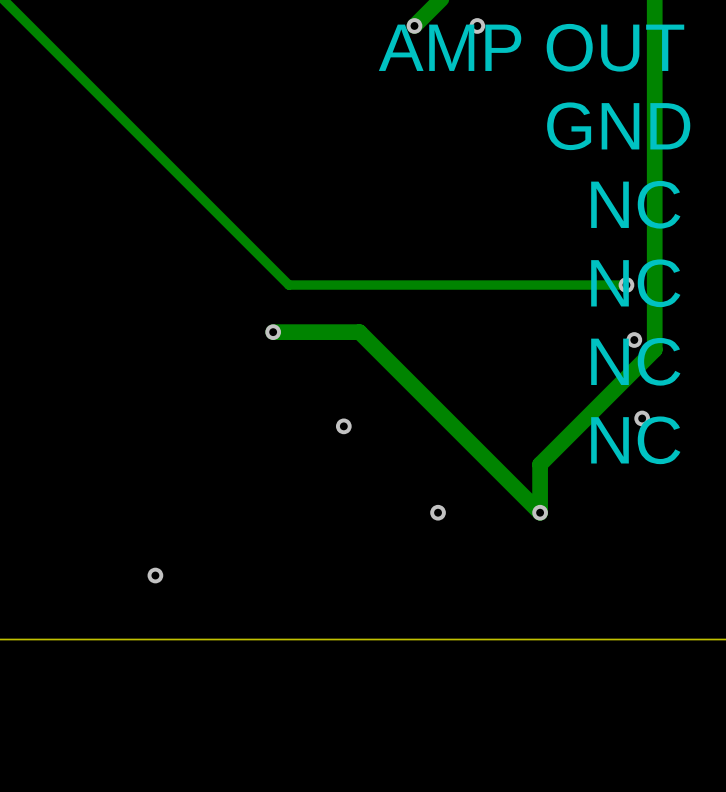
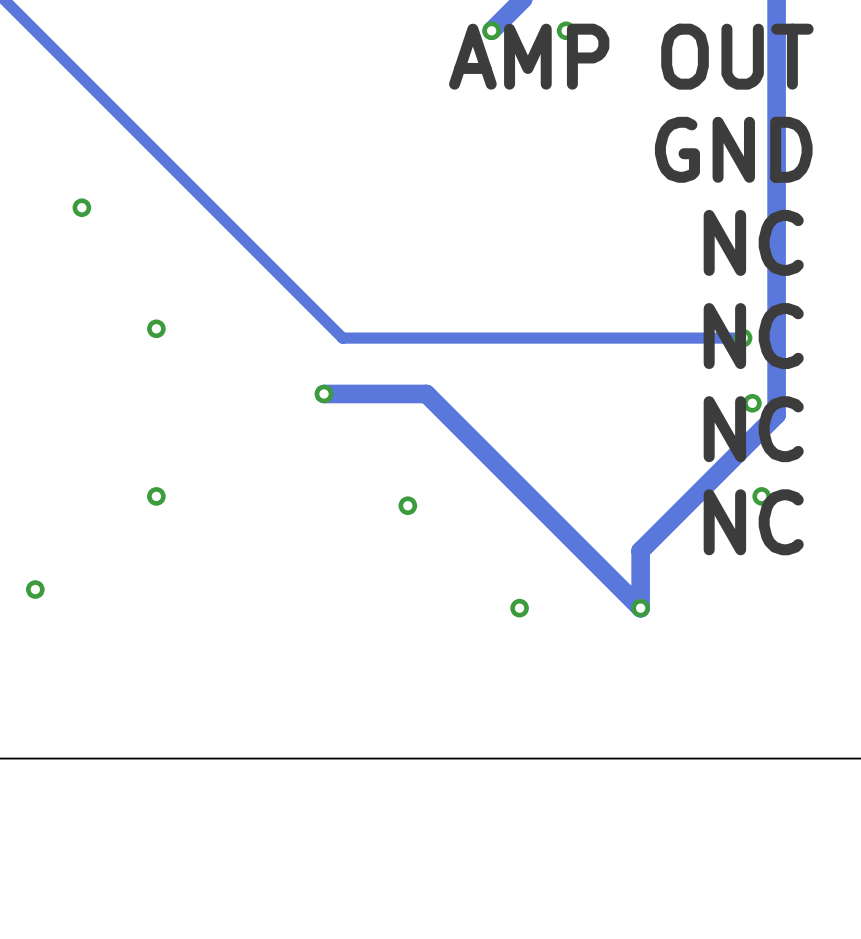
via: none -> (81, 207)
via: none -> (156, 328)
via: none -> (156, 496)
via: none -> (35, 589)
via: (155, 575) -> none

